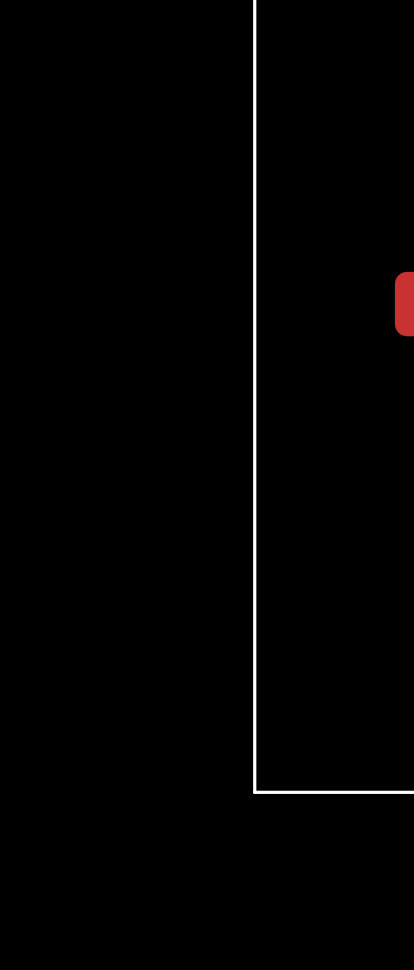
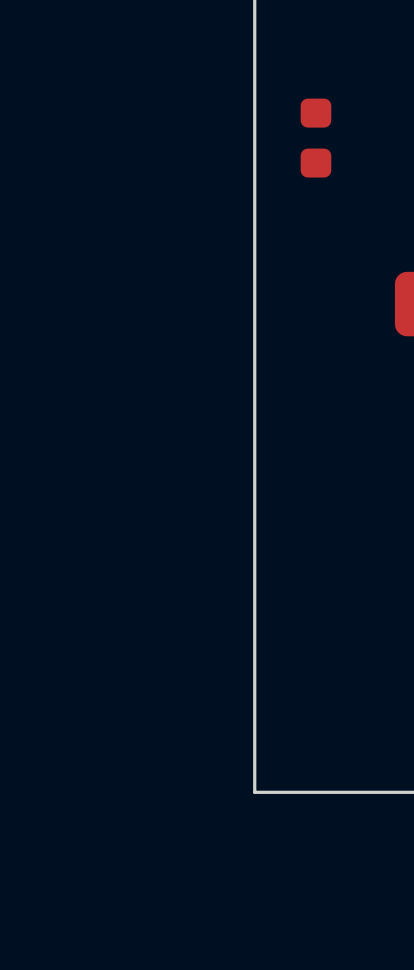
part: none -> (315, 138)

